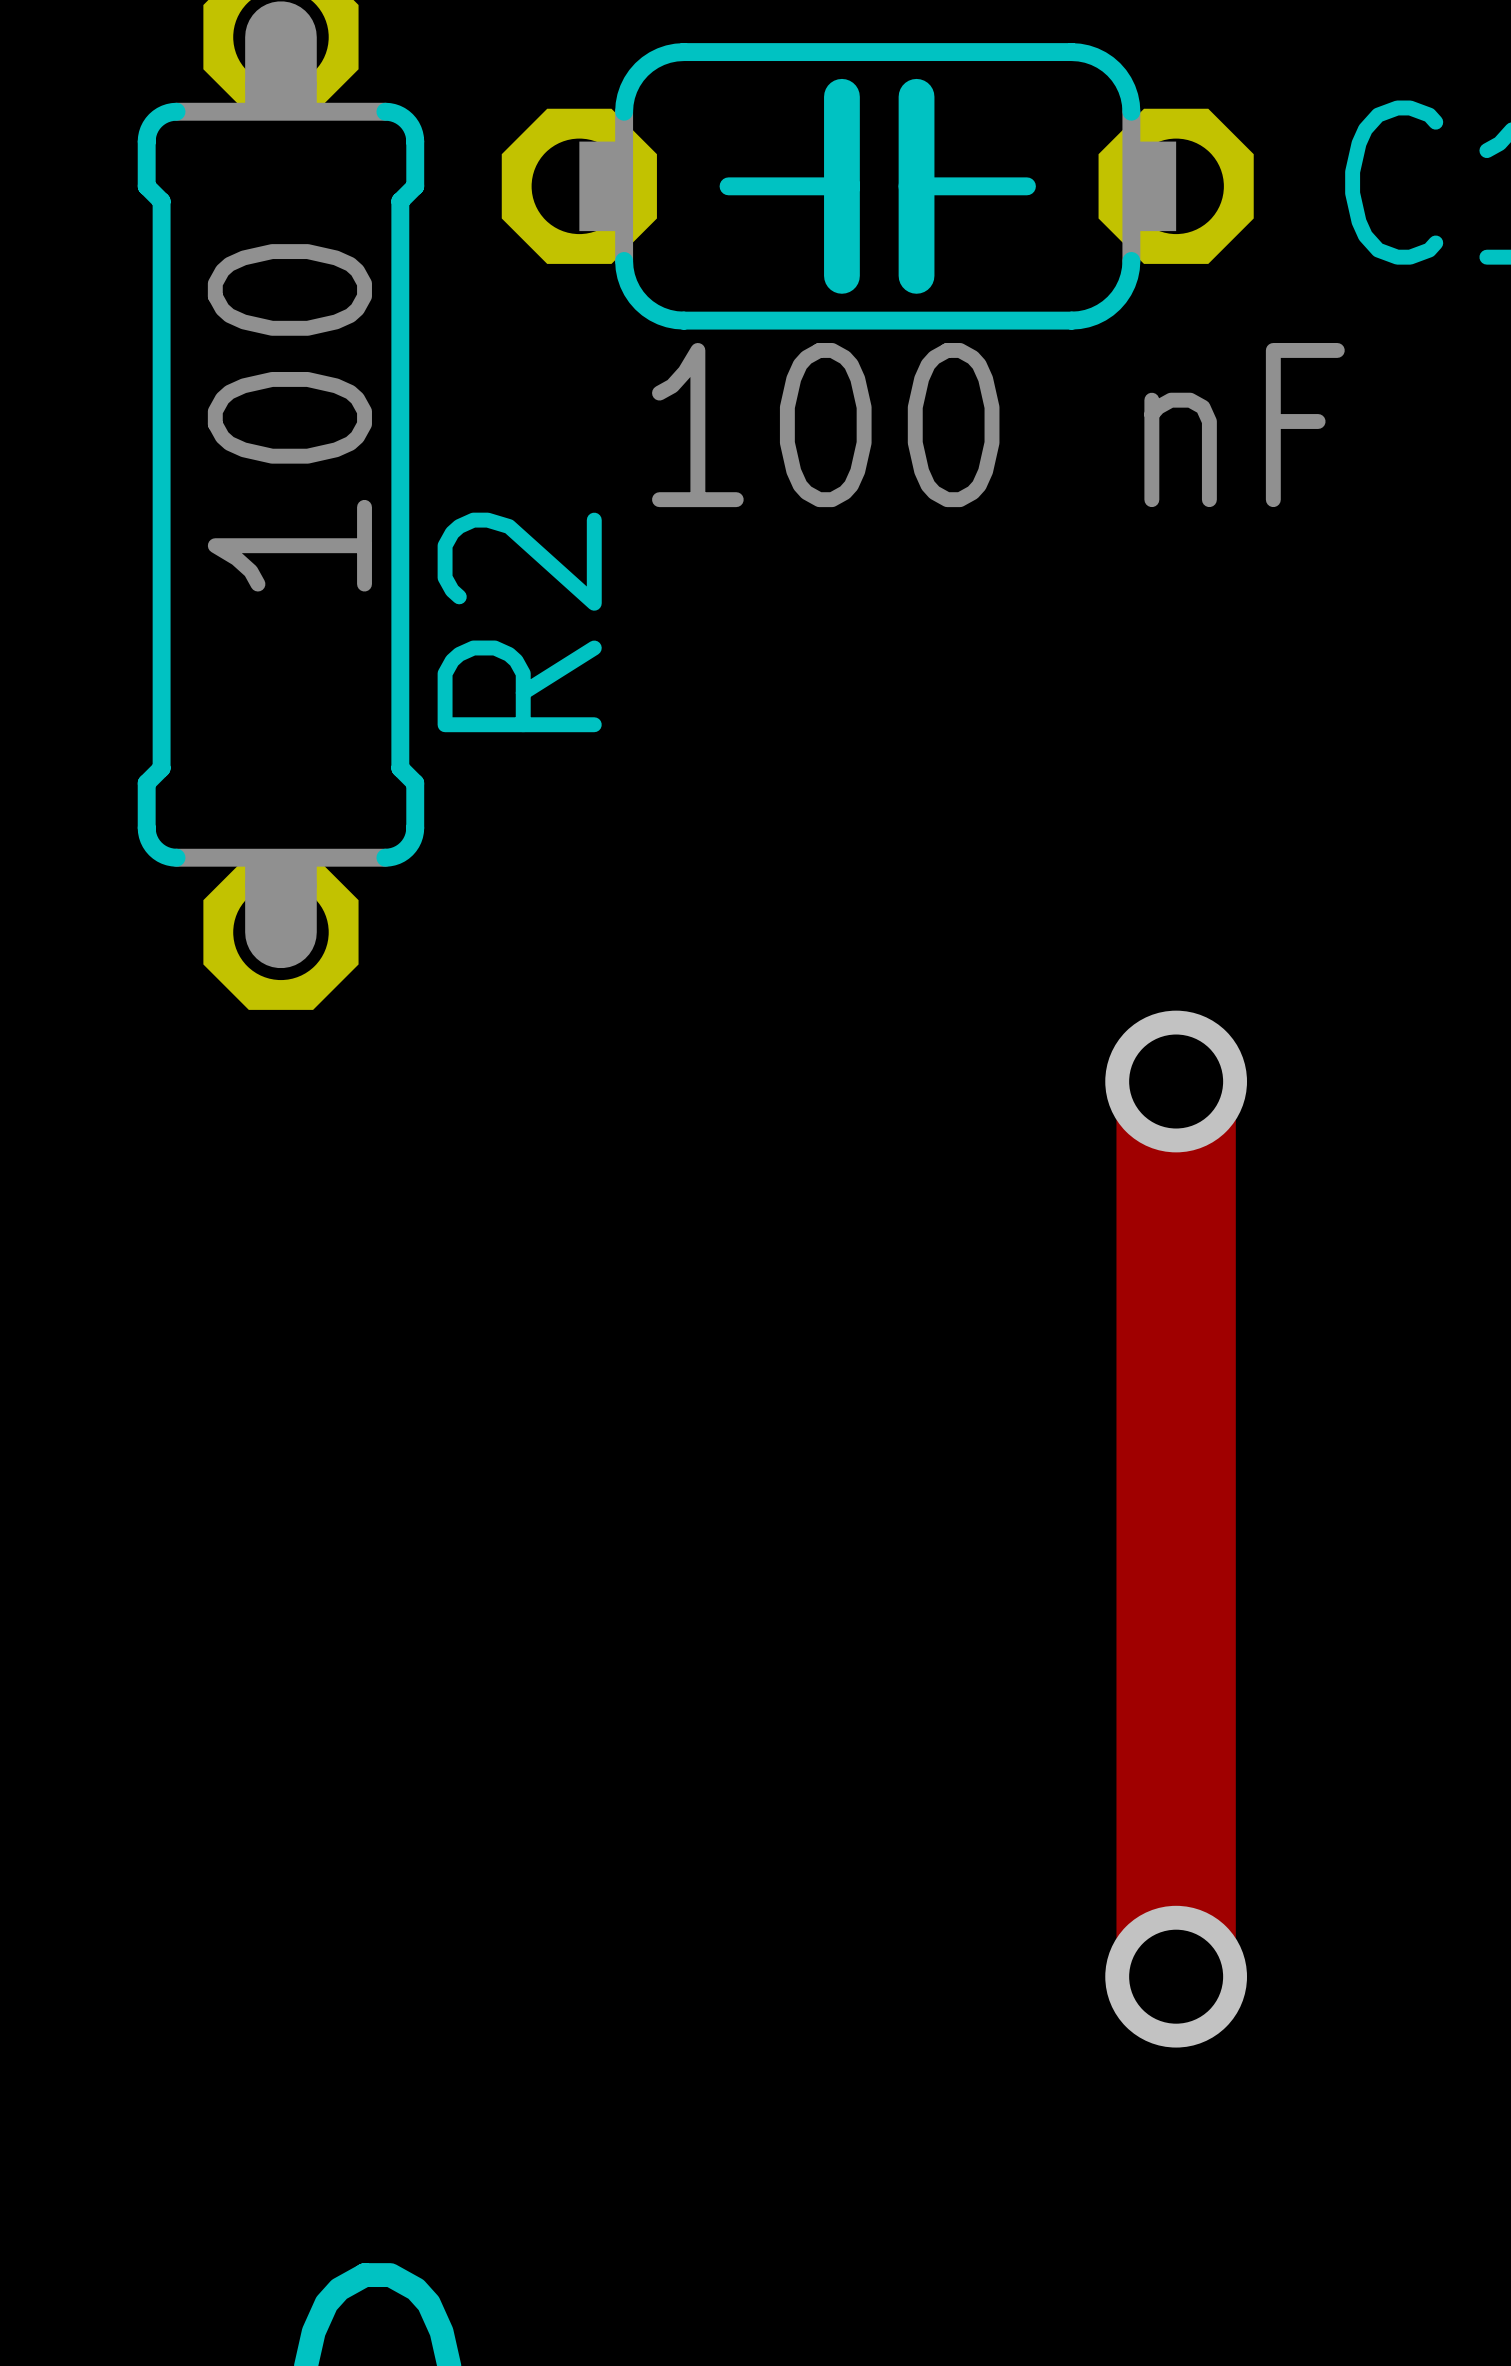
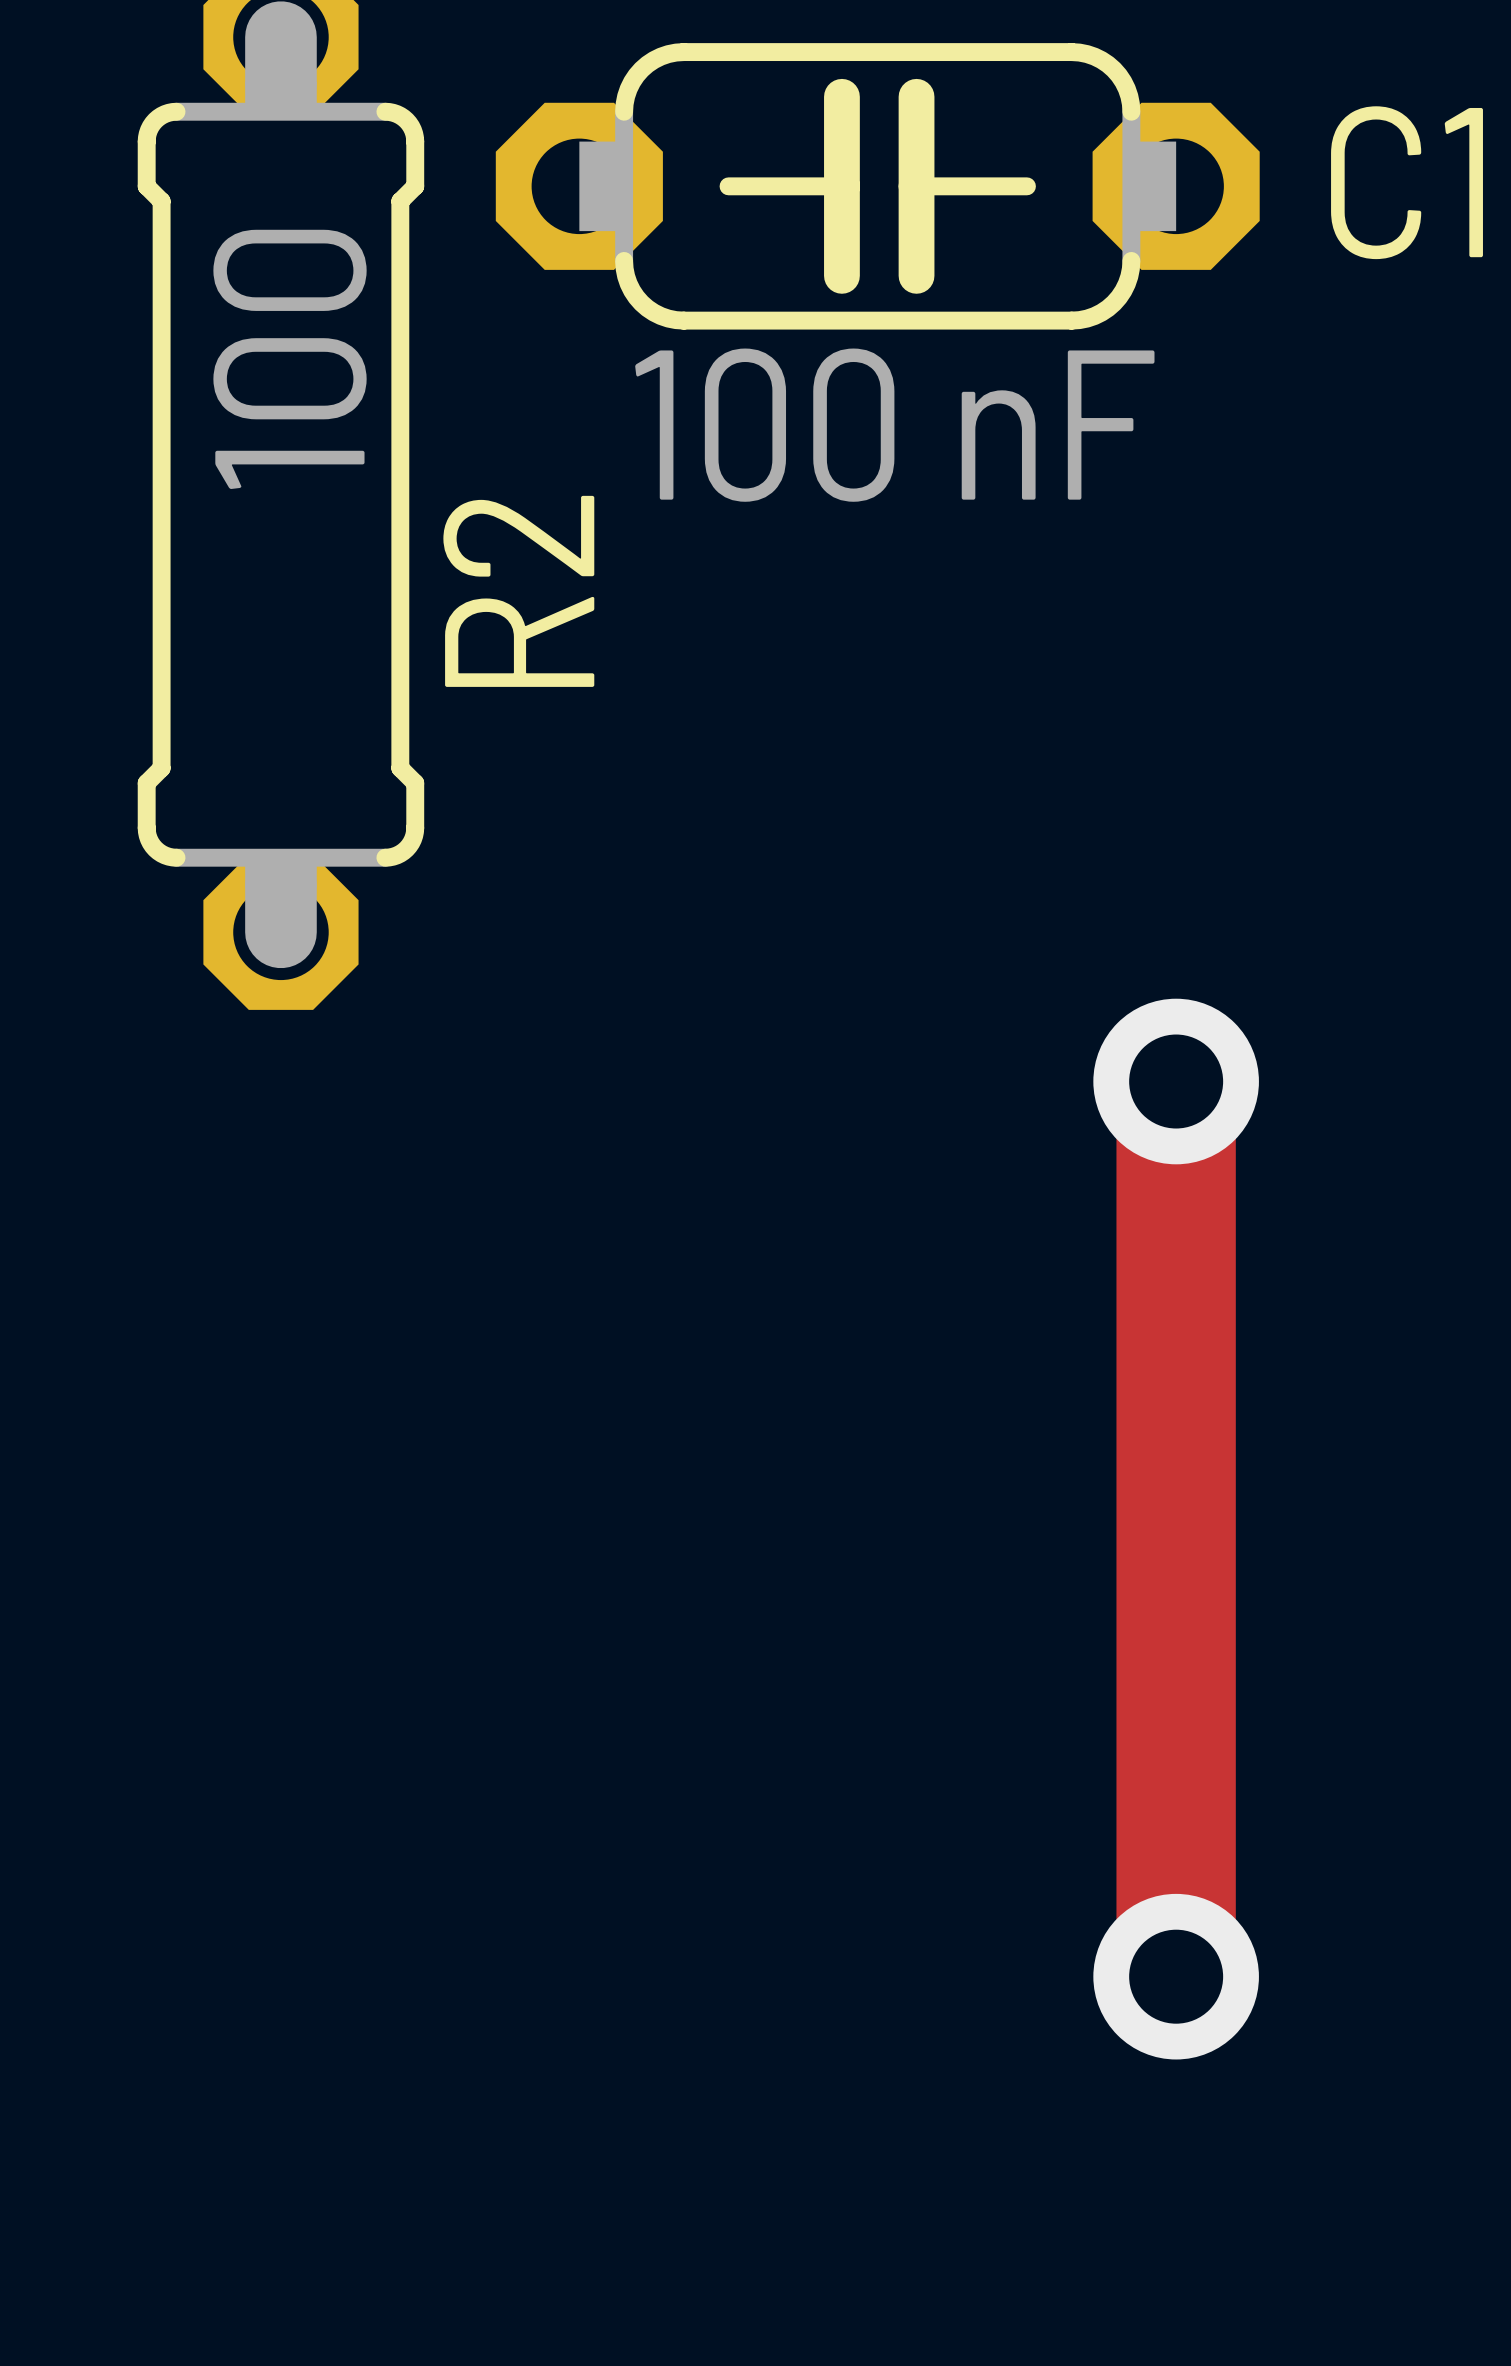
C1 footprint: [501, 43, 1254, 330] -> [495, 43, 1260, 330]
via size: [1105, 1010, 1248, 1153] -> [1093, 998, 1259, 1165]
via size: [1105, 1905, 1248, 2048] -> [1093, 1893, 1259, 2060]

